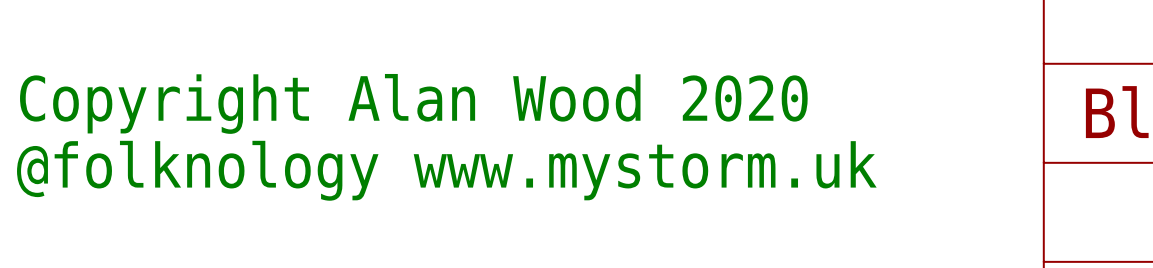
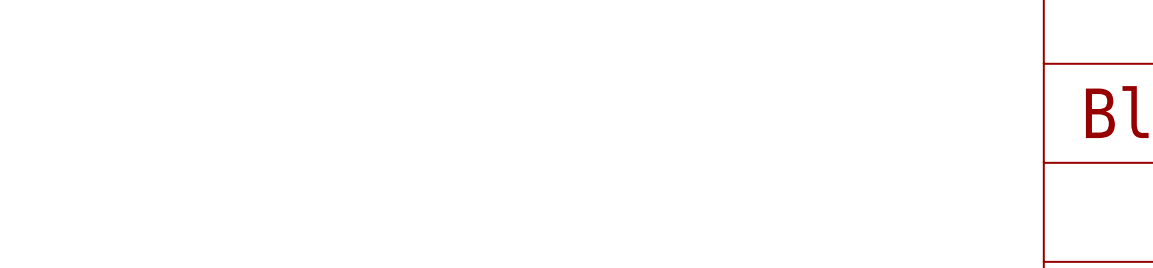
text: Copyright Alan Wood 2020 (413, 103) -> none
text: @folknology www.mystorm.uk (446, 170) -> none

